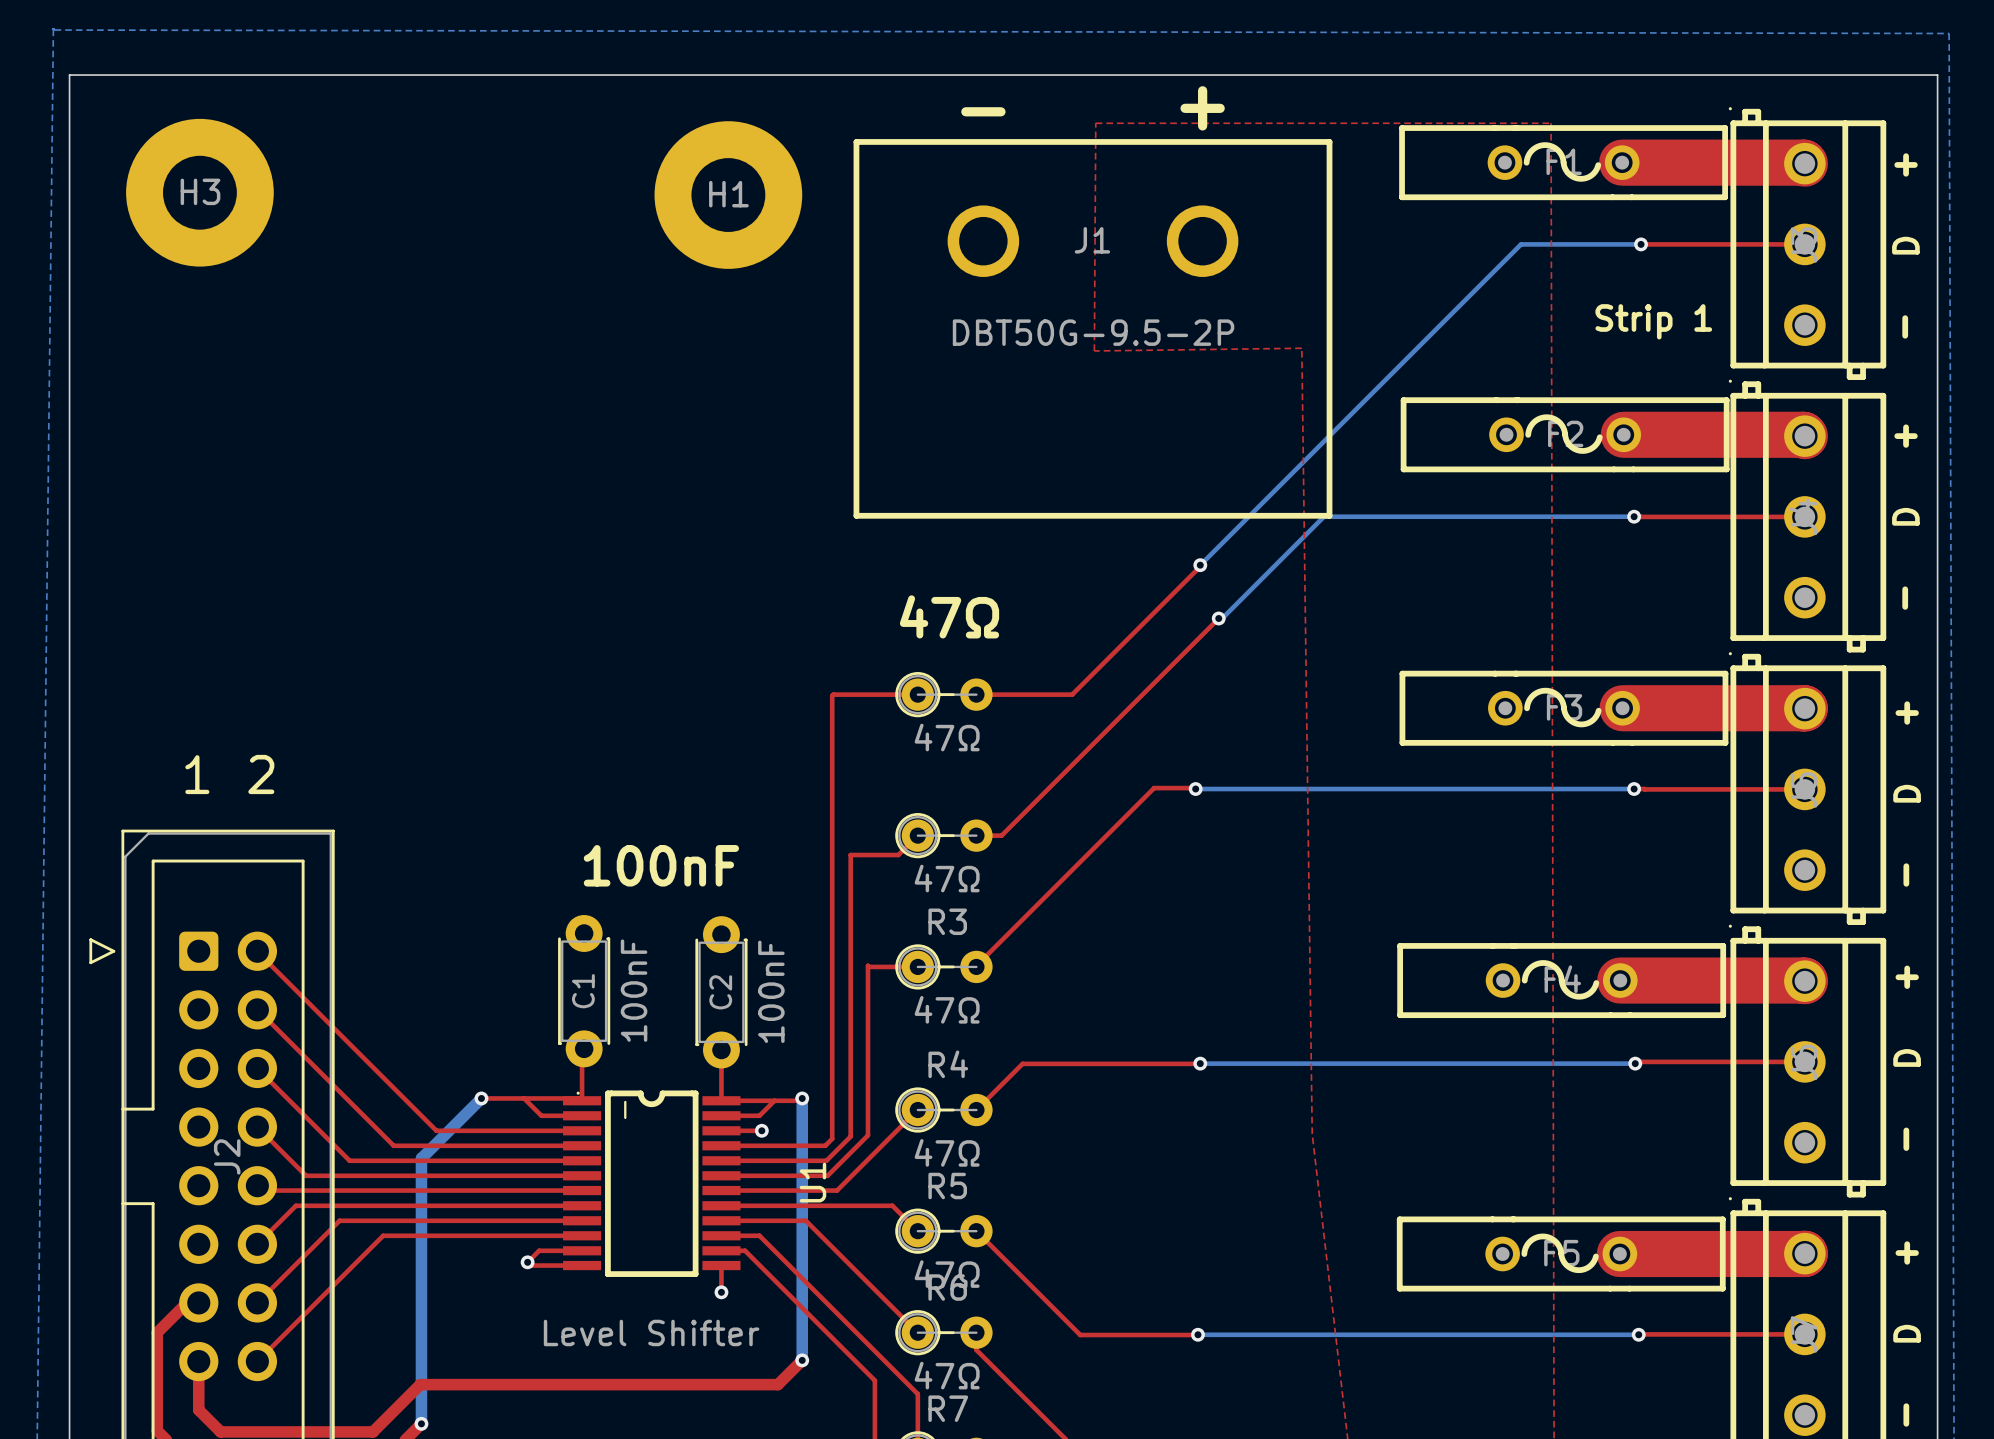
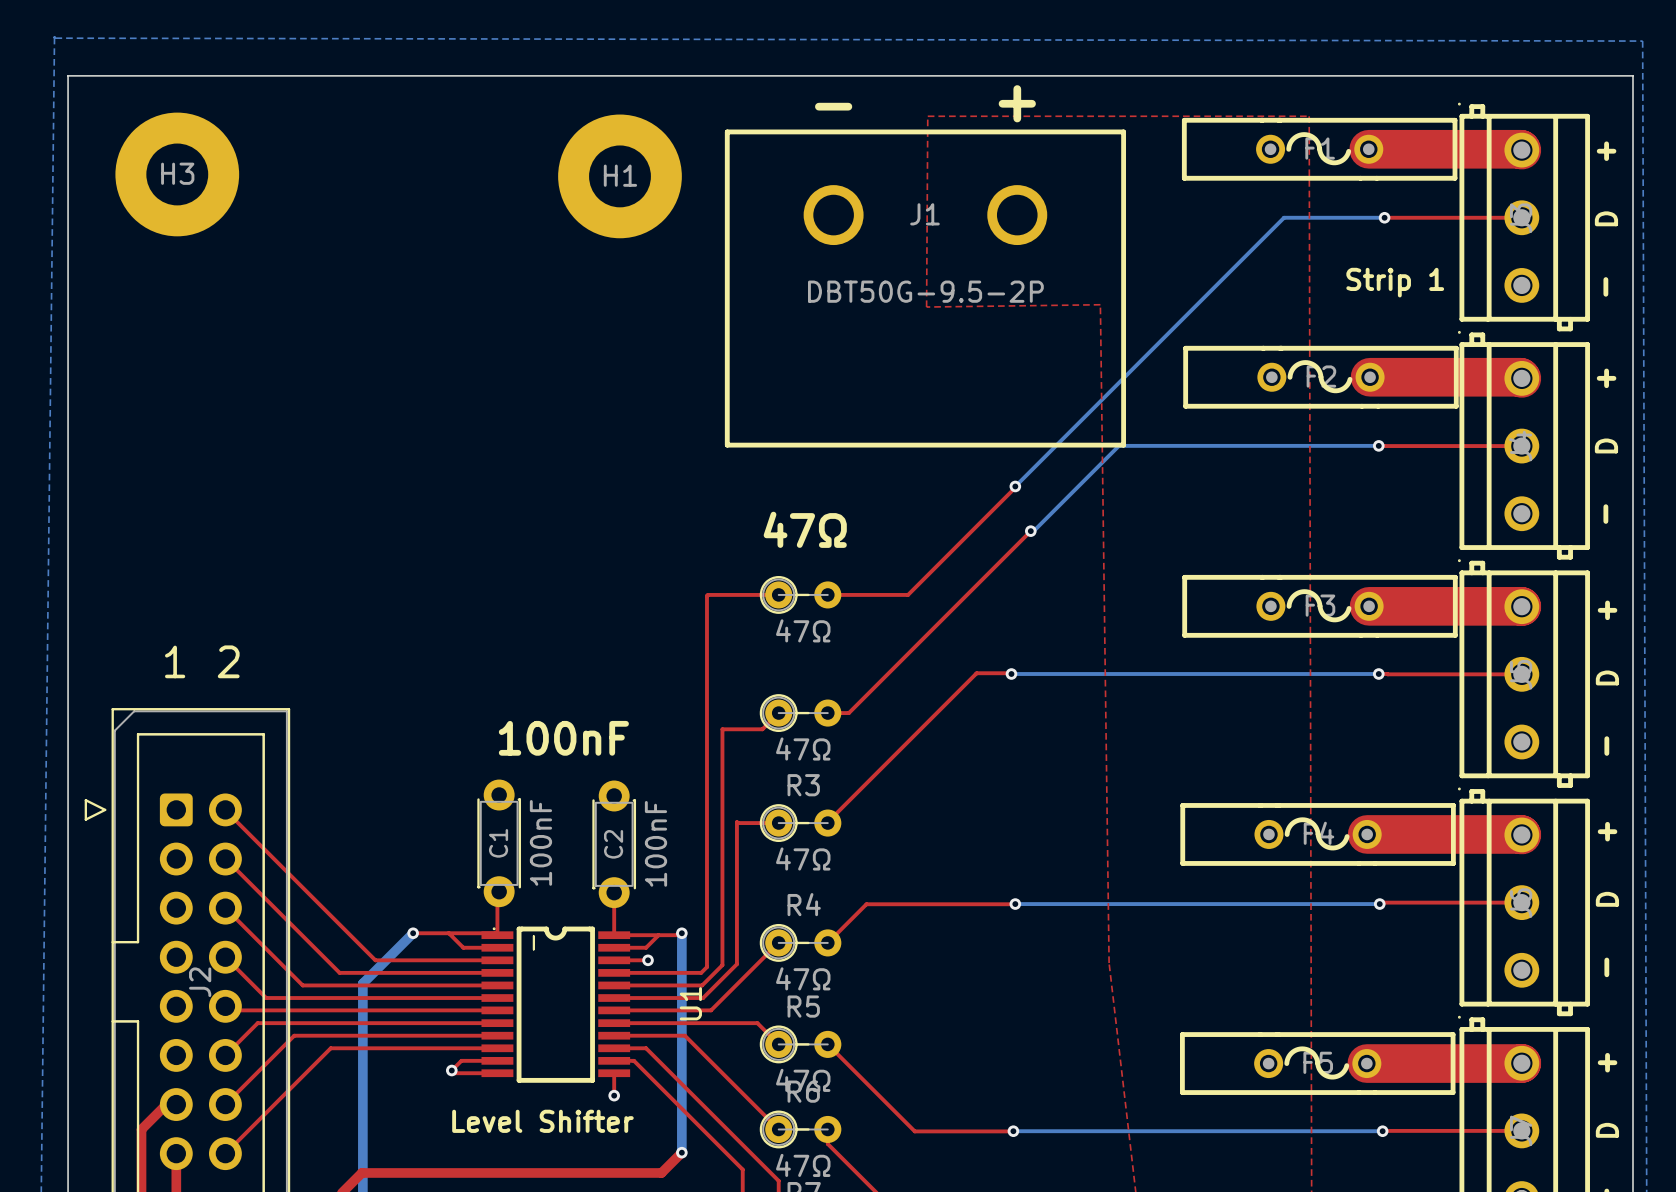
text: none -> Level Shifter (542, 1121)
U1 value: Level Shifter (651, 1332) -> none

